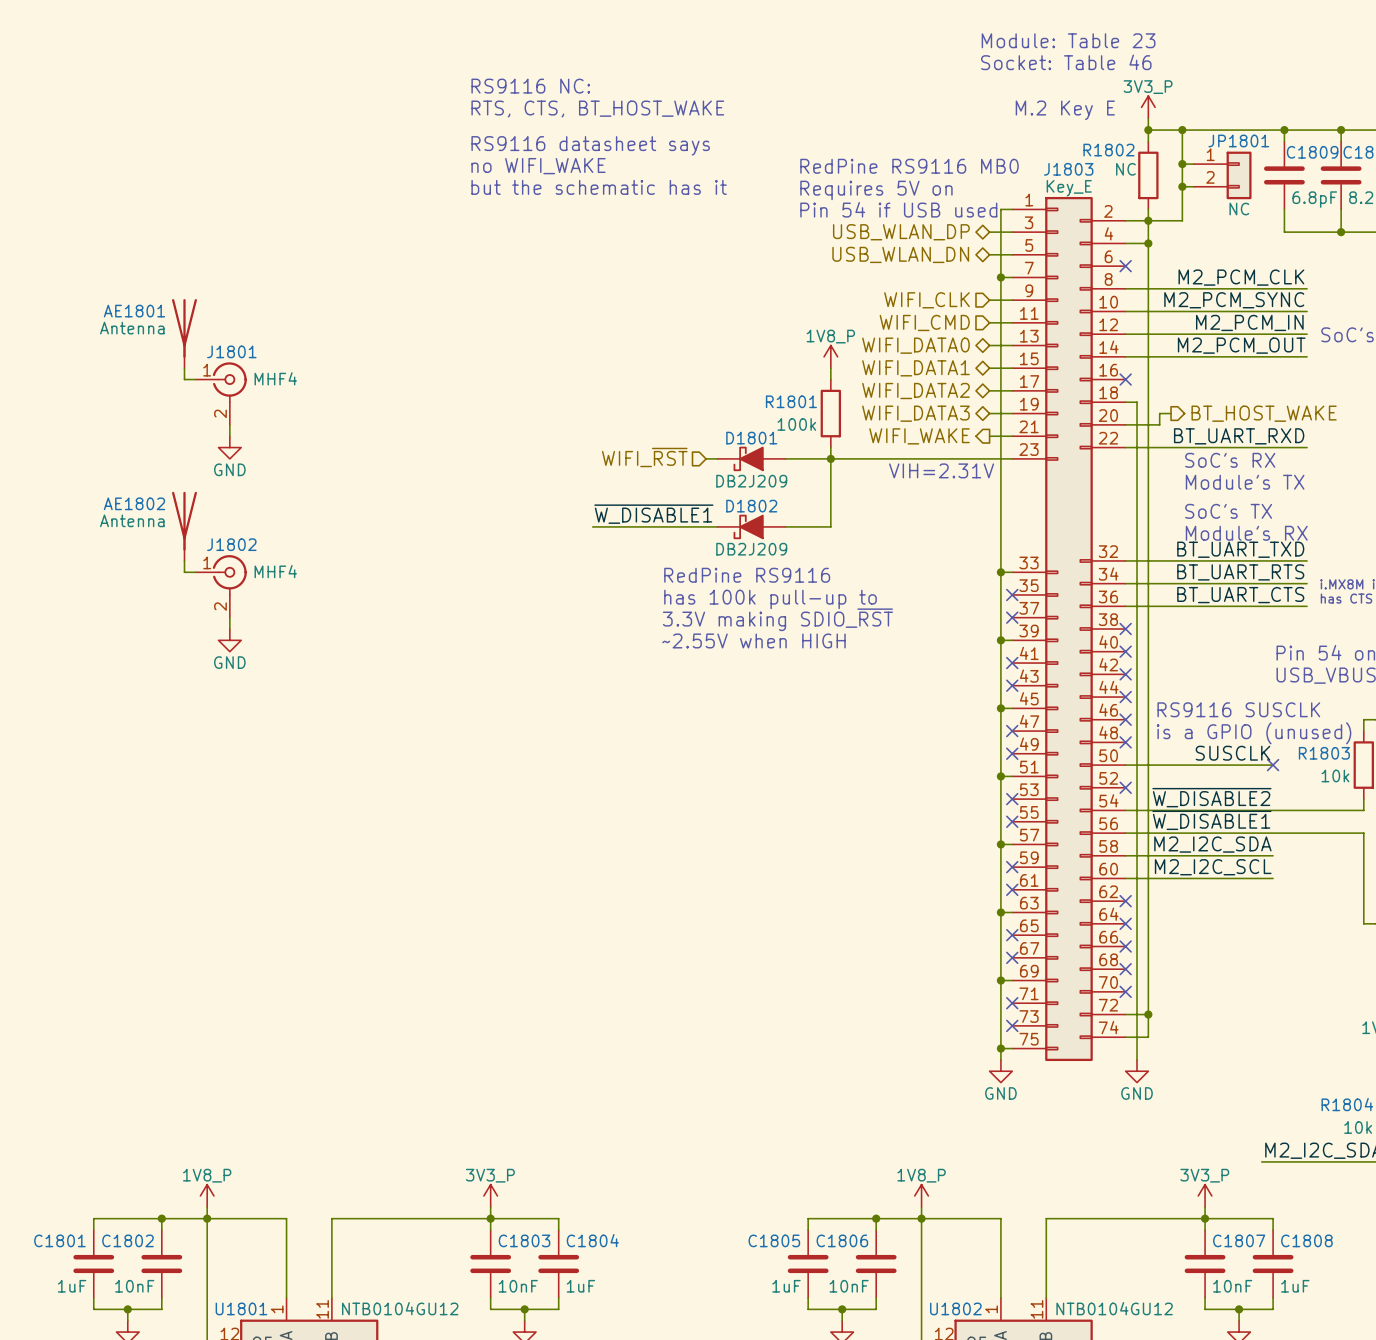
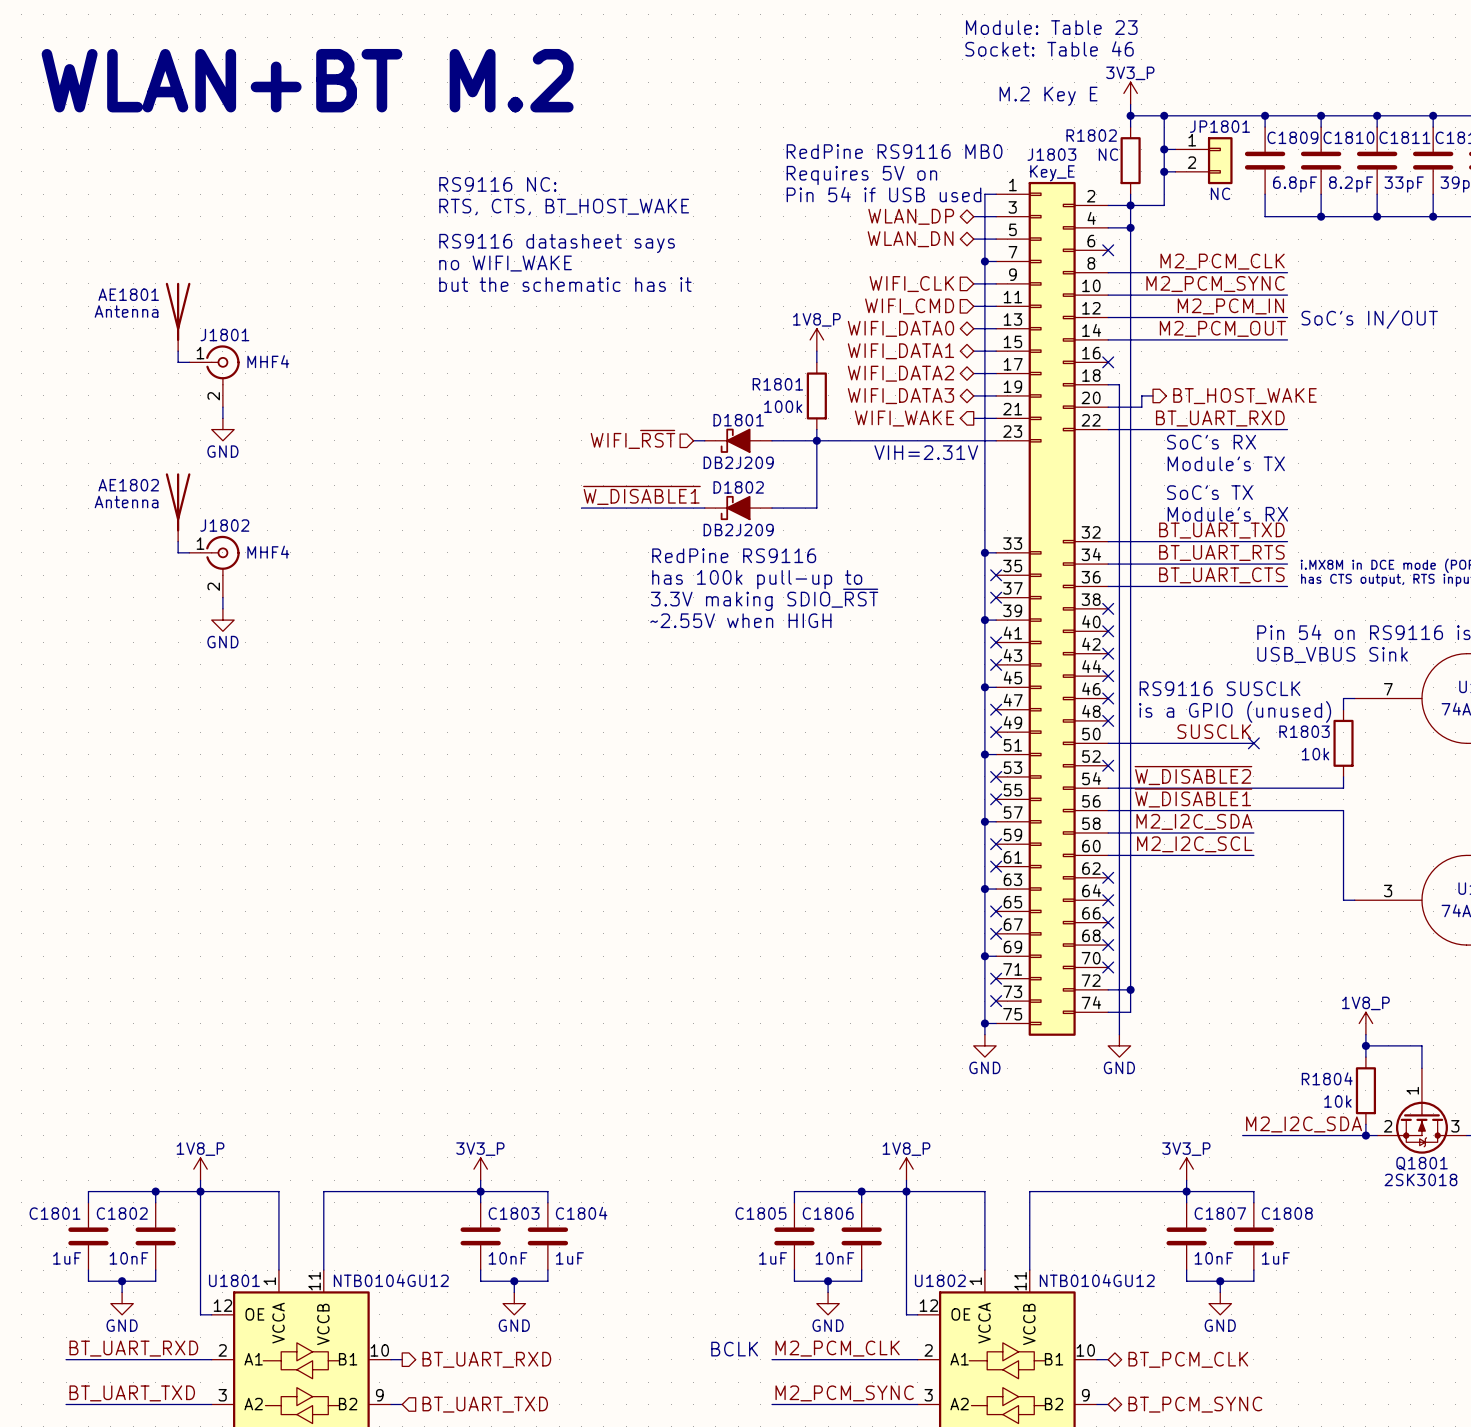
text position: RS9116 NC: (530, 86) -> RS9116 NC: (497, 184)
text: none -> WLAN+BT M.2 (307, 80)
text position: RTS, CTS, BT_HOST_WAKE (597, 109) -> RTS, CTS, BT_HOST_WAKE (564, 207)
text position: RS9116 datasheet says (590, 145) -> RS9116 datasheet says (557, 243)
text position: no WIFI_WAKE (538, 166) -> no WIFI_WAKE (505, 263)
text position: but the schematic has it (599, 187) -> but the schematic has it (565, 284)
hierarchical label: USB_WLAN_DP (901, 232) -> WLAN_DP (911, 216)
hierarchical label: USB_WLAN_DN (900, 254) -> WLAN_DN (910, 239)

